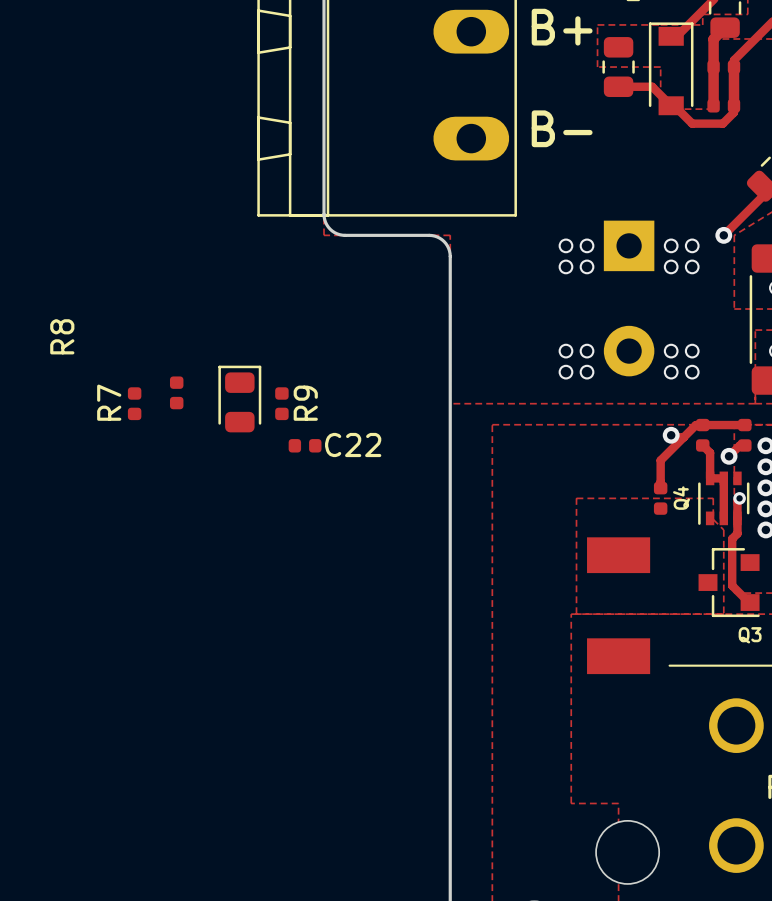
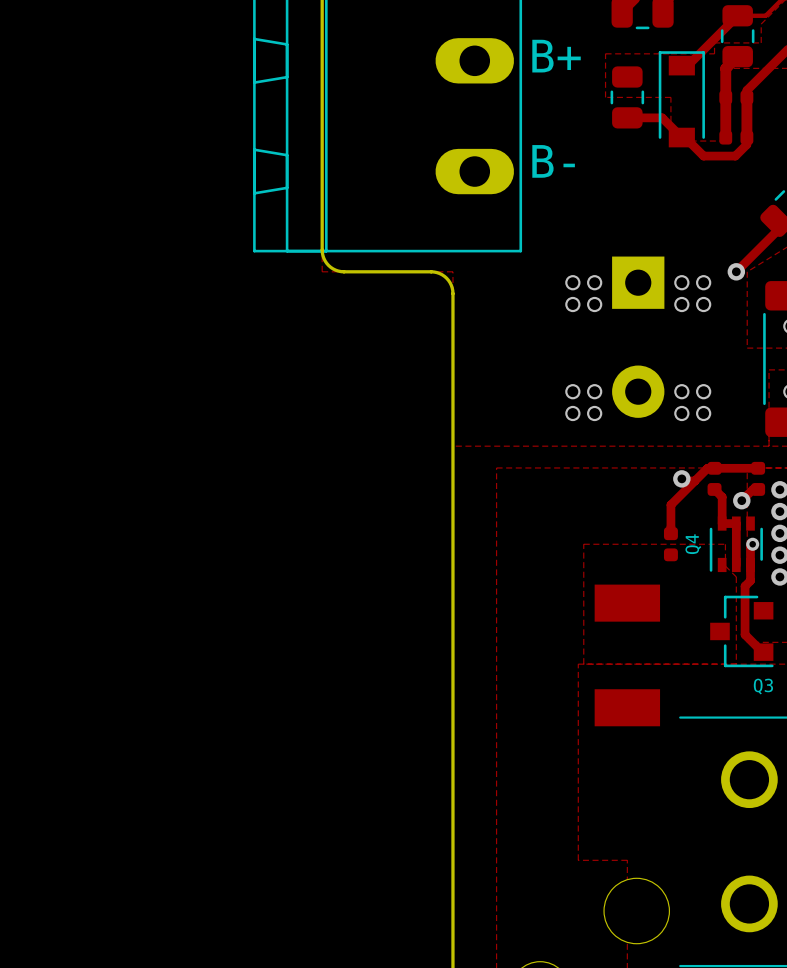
R8: (176, 392) -> none
part: (239, 399) -> none
R7: (134, 403) -> none
R9: (281, 403) -> none
C22: (305, 445) -> none

